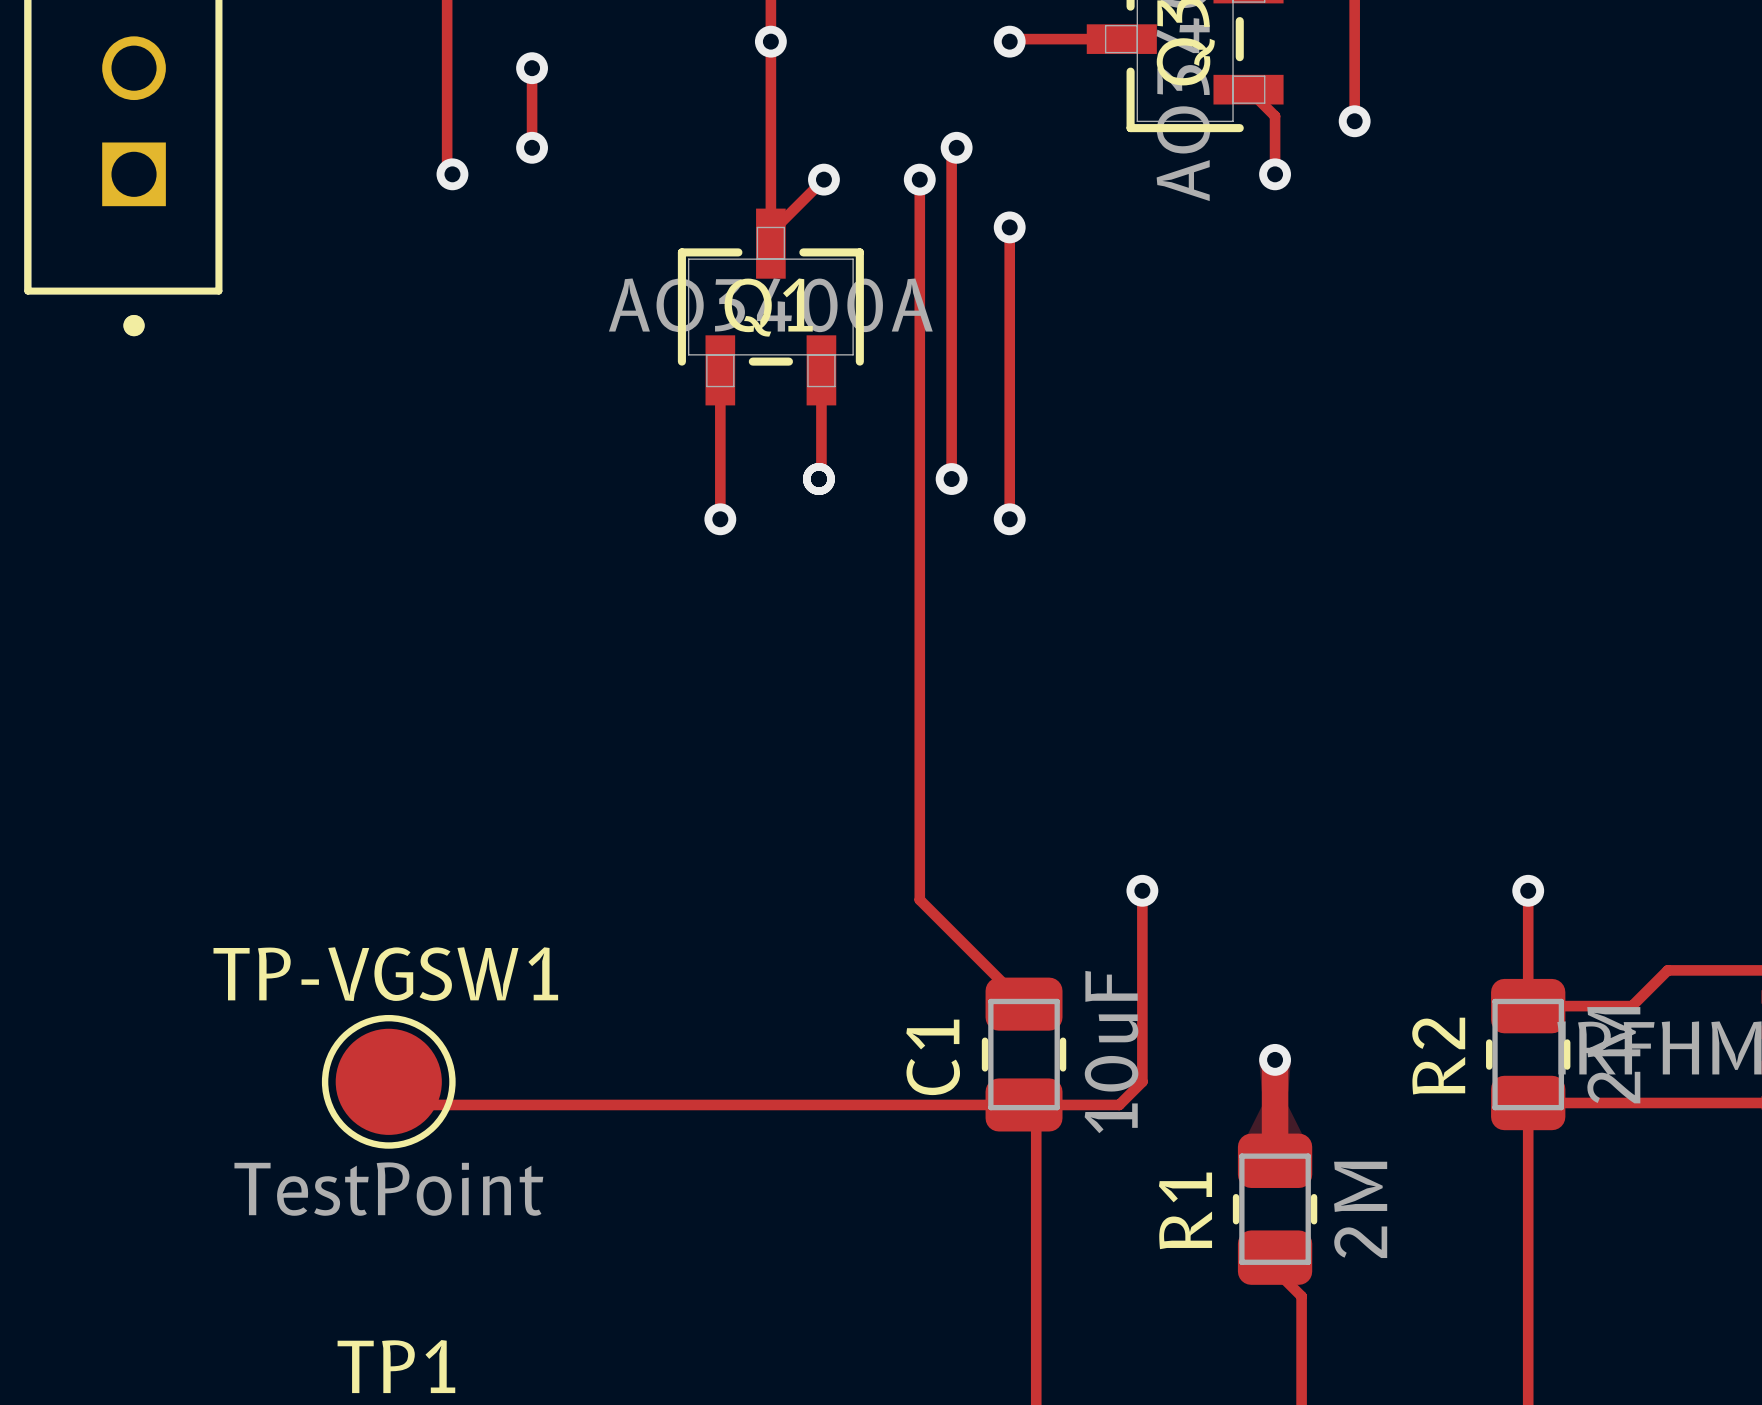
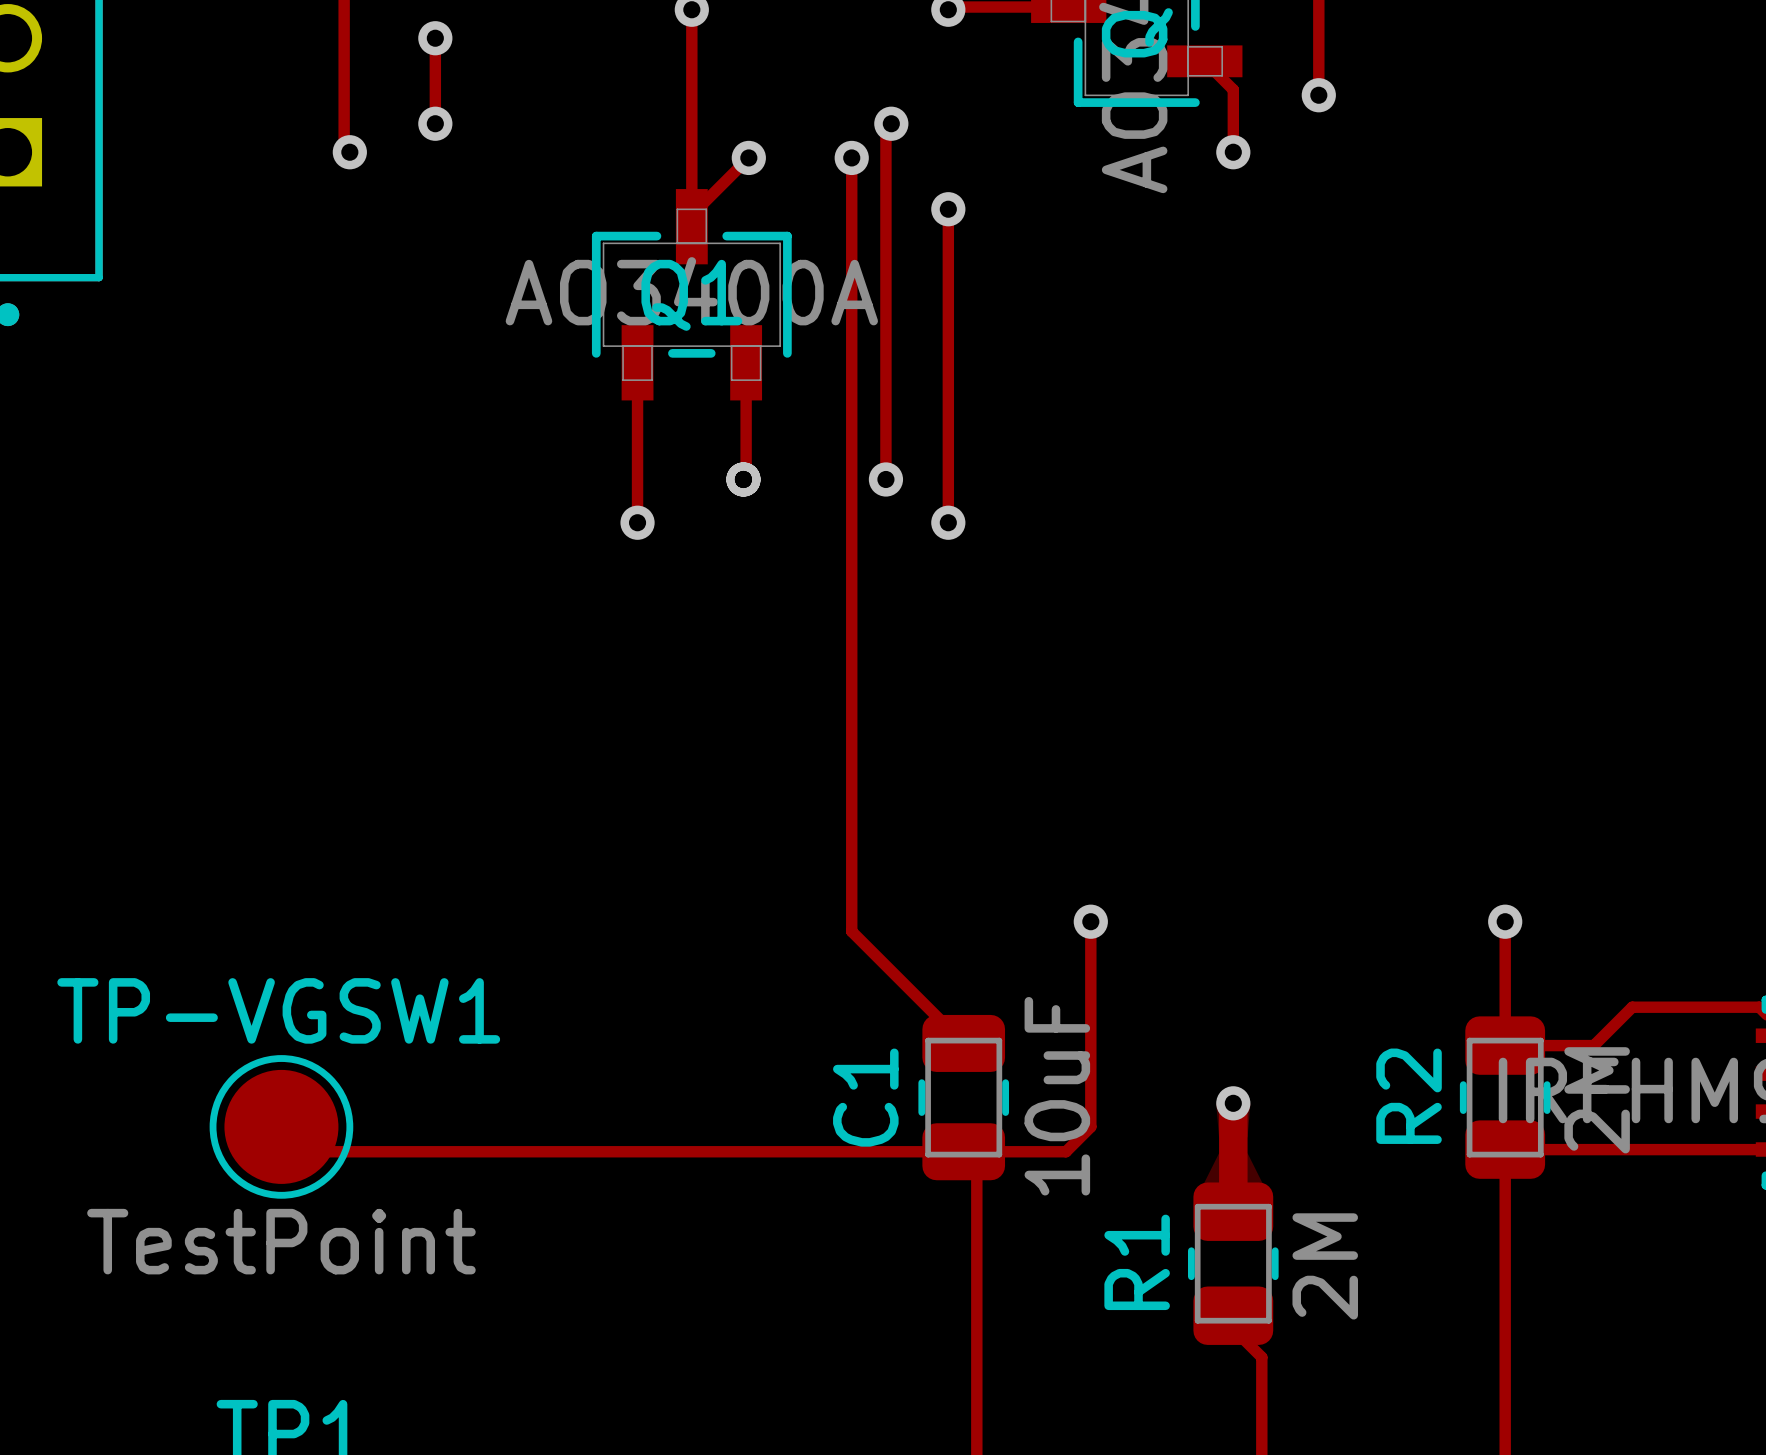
track: (1667, 970) (1632, 1006) (1610, 1006) -> (1655, 1007) (1632, 1007) (1593, 1045)

